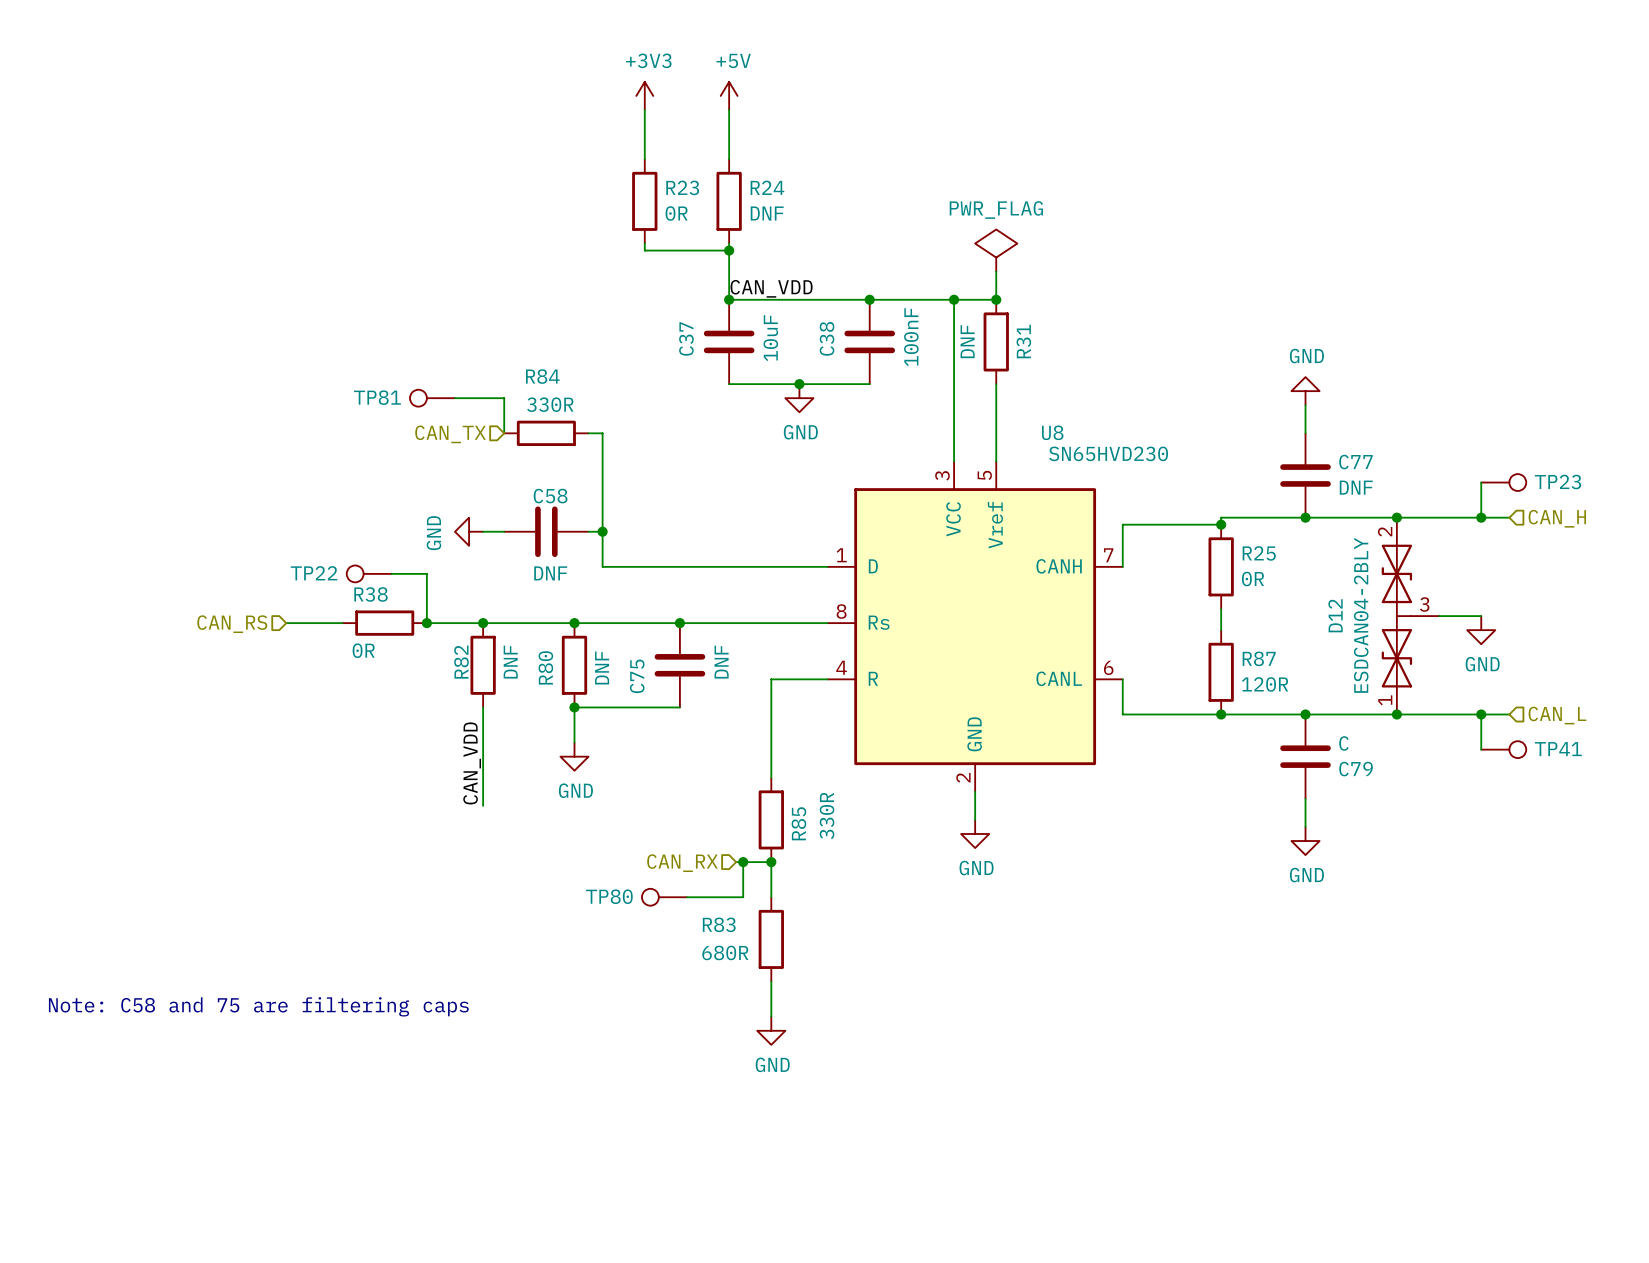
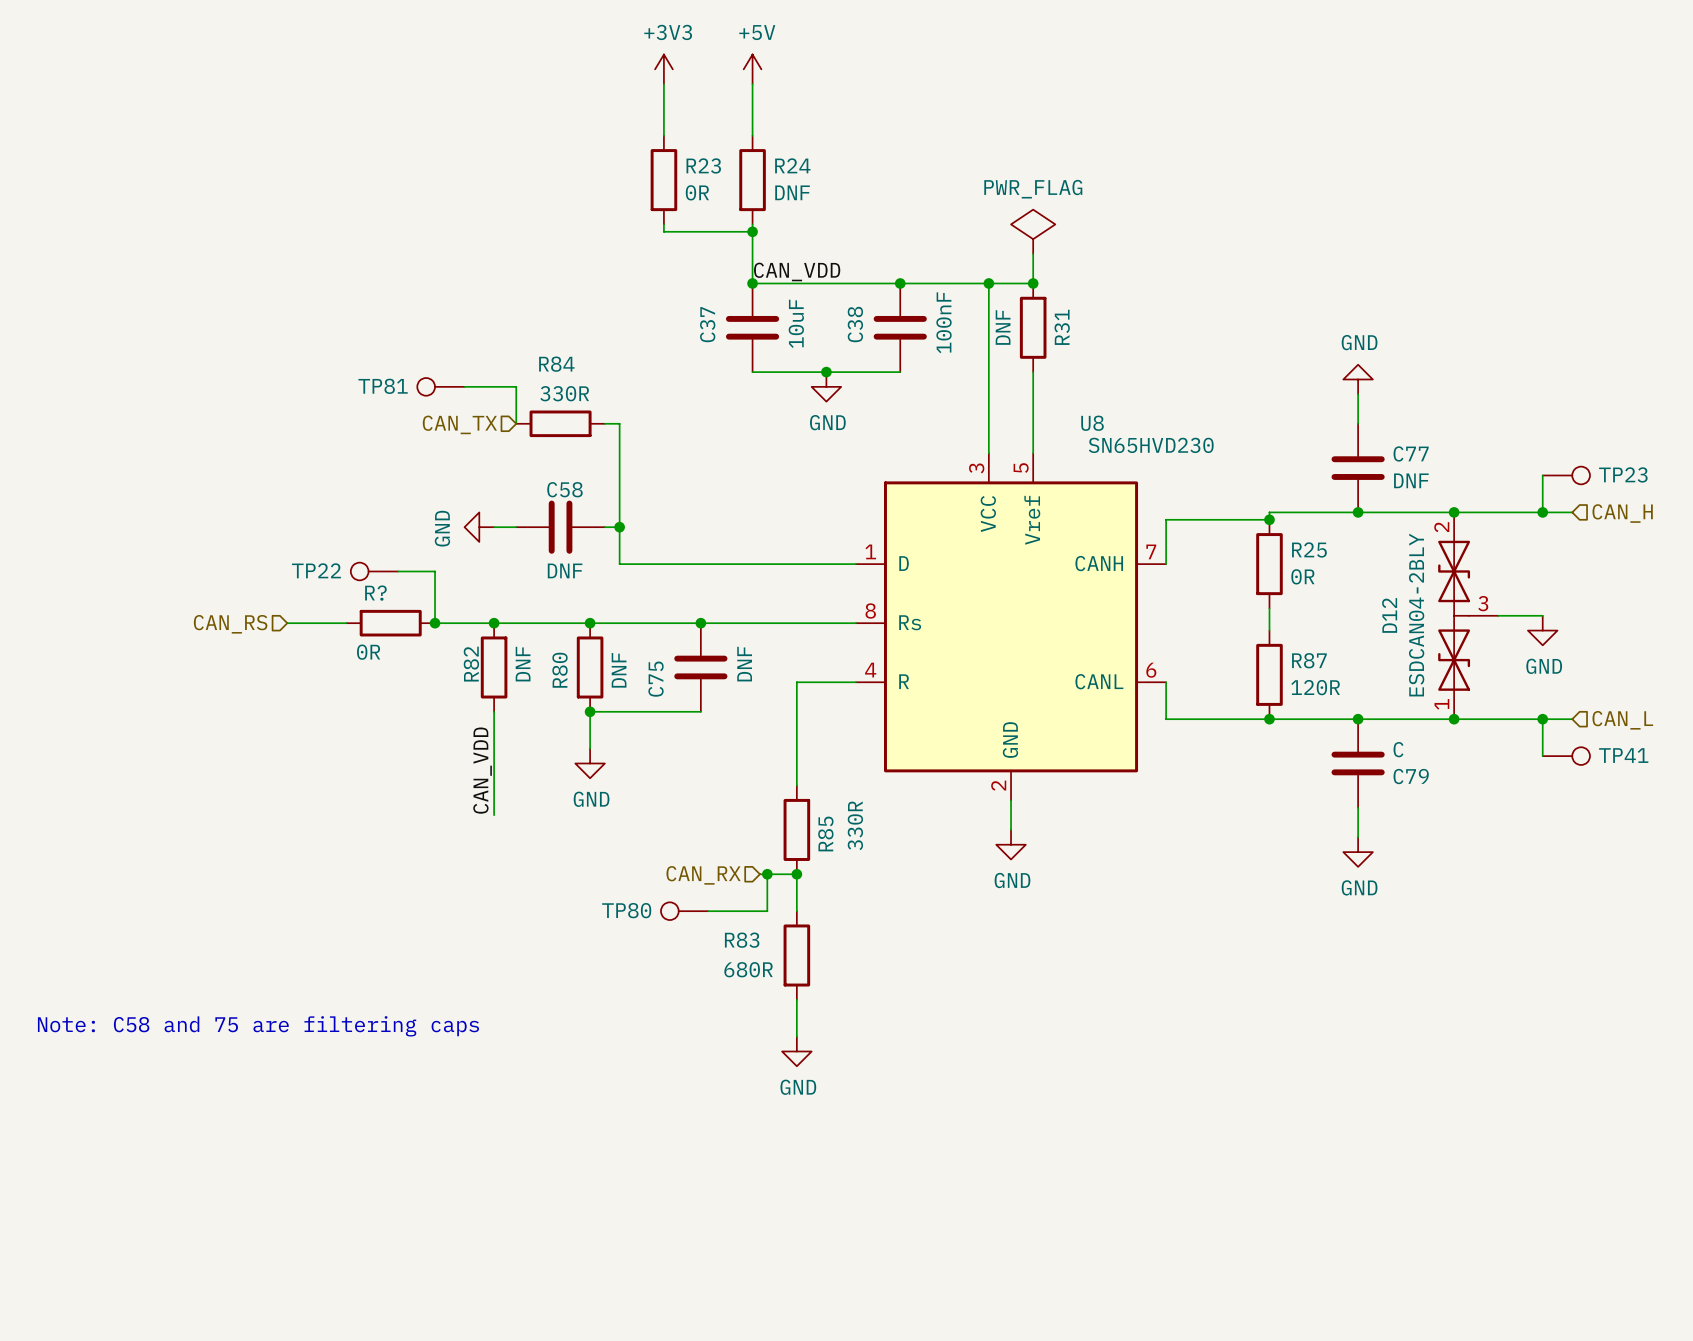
R38 name: R38 (371, 594) -> R? (375, 593)

